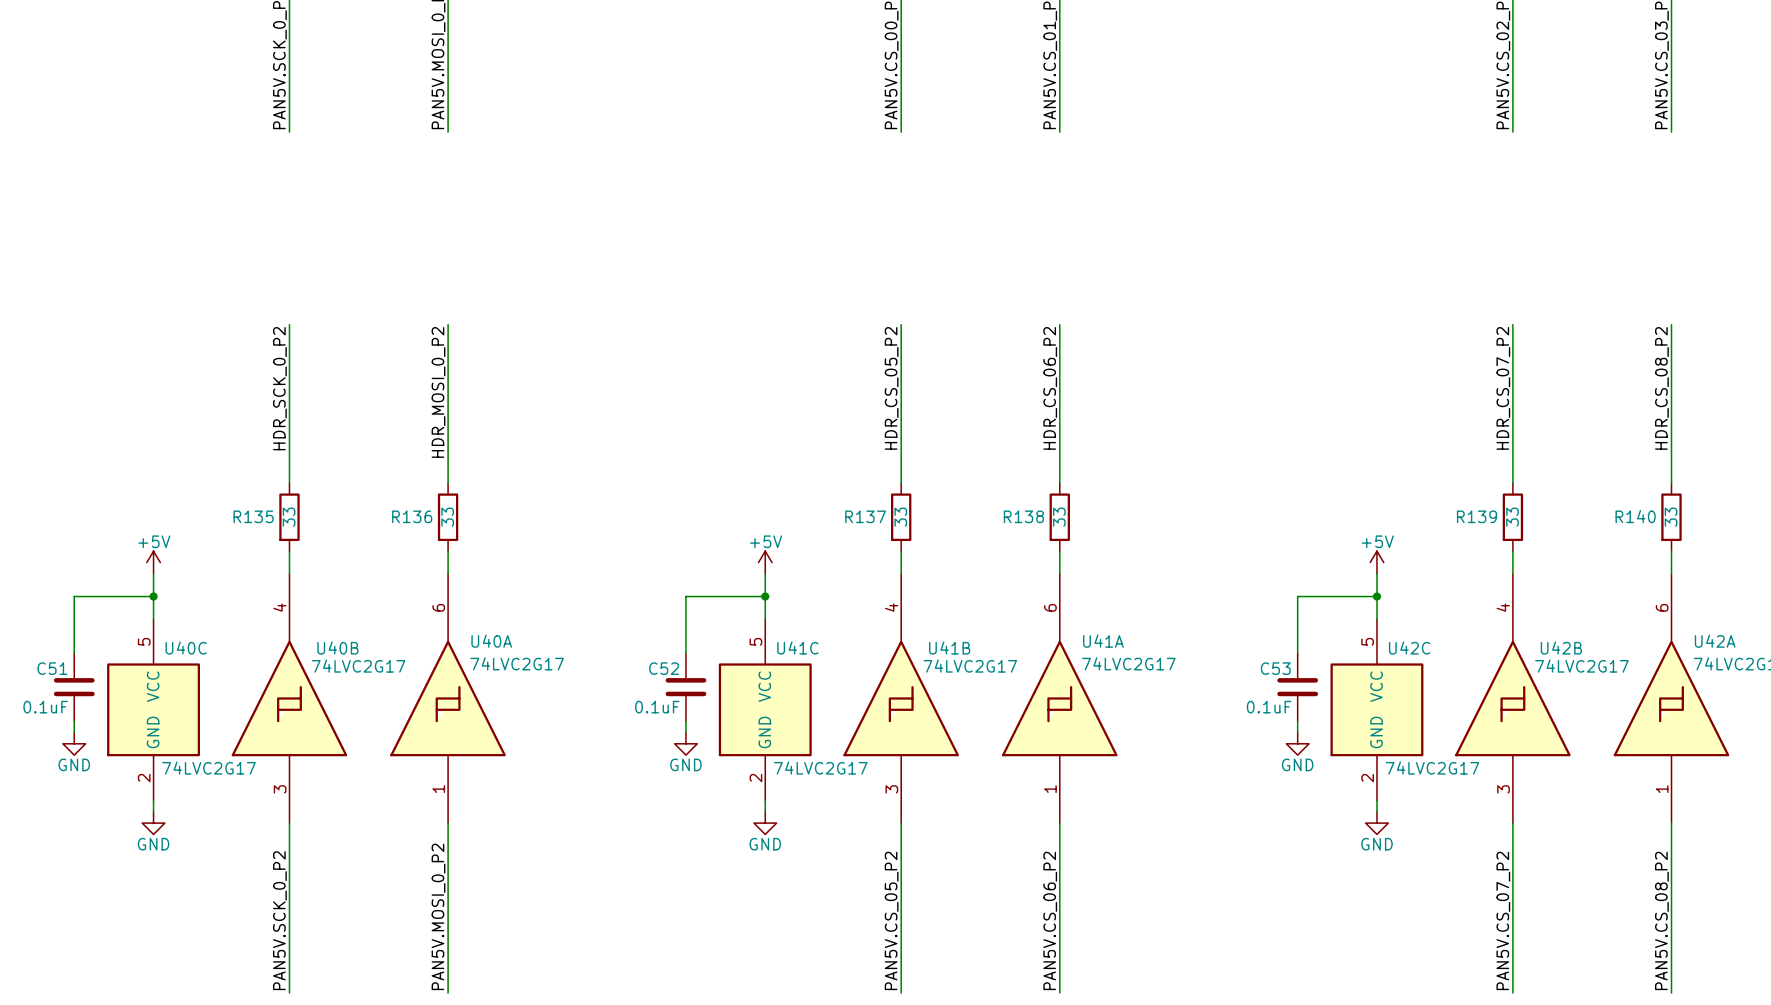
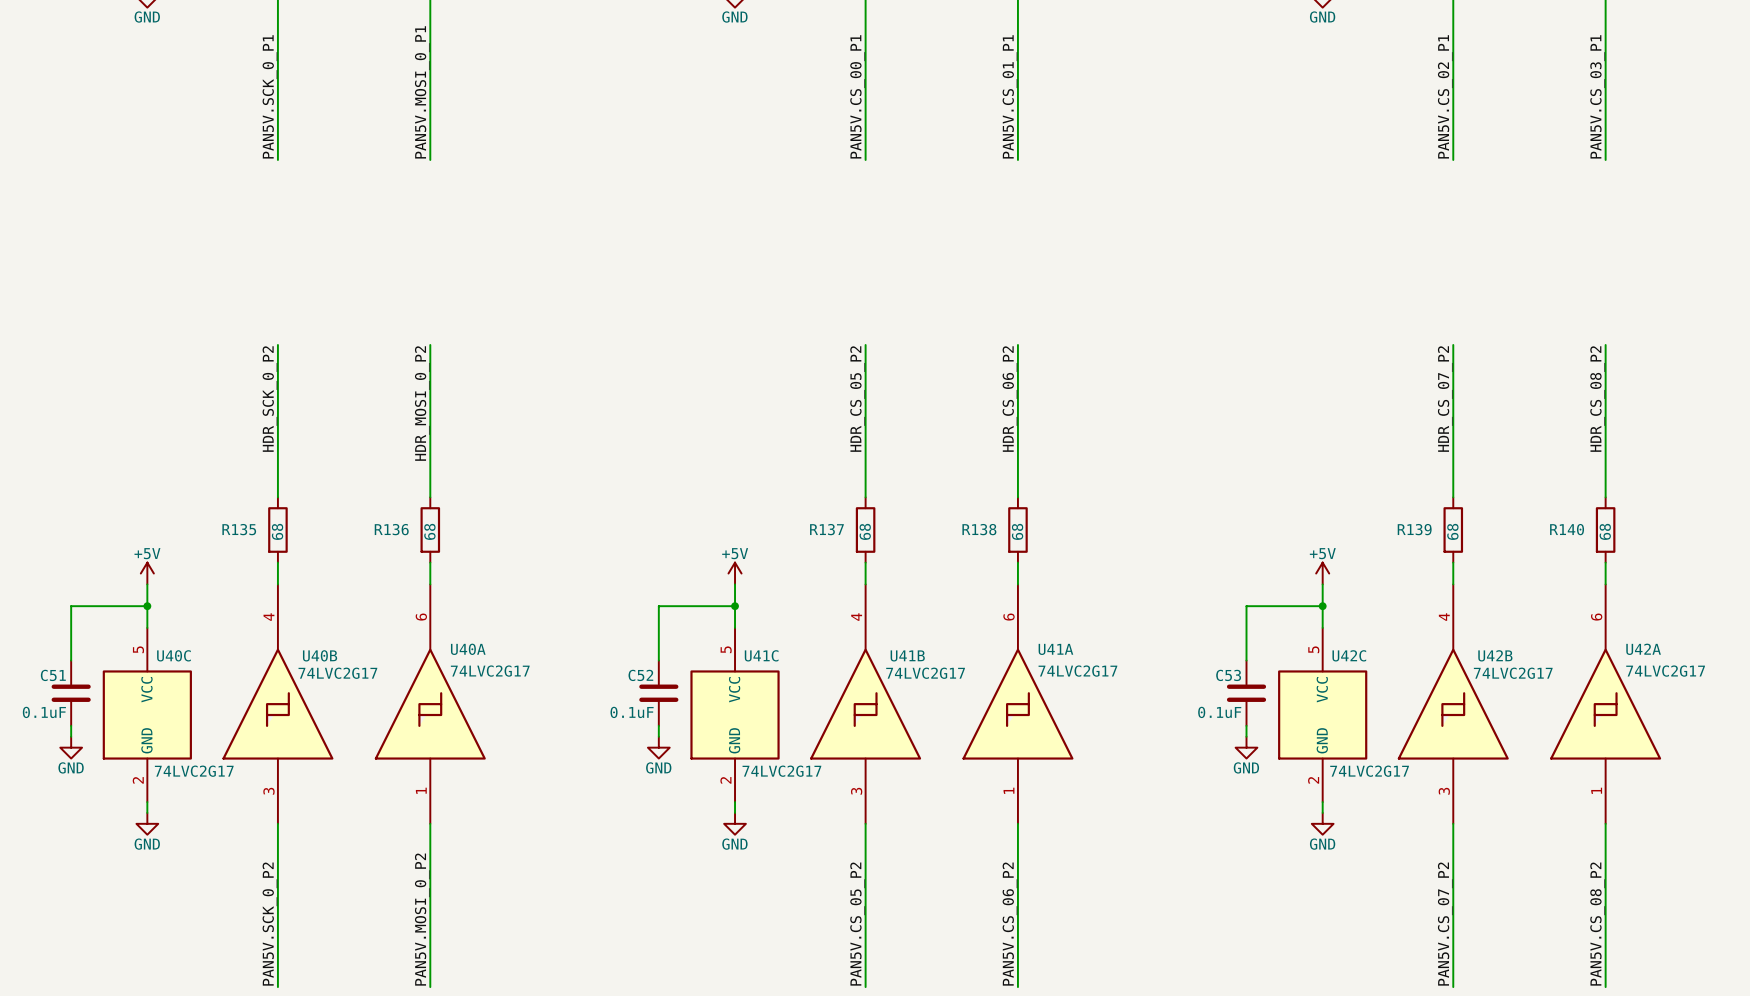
R135 value: 33 (289, 517) -> 68 (277, 531)
R136 value: 33 (447, 517) -> 68 (429, 531)
R137 value: 33 (900, 517) -> 68 (865, 531)
R138 value: 33 (1059, 517) -> 68 (1017, 531)
R139 value: 33 (1512, 517) -> 68 (1452, 531)
R140 value: 33 (1671, 517) -> 68 (1605, 531)

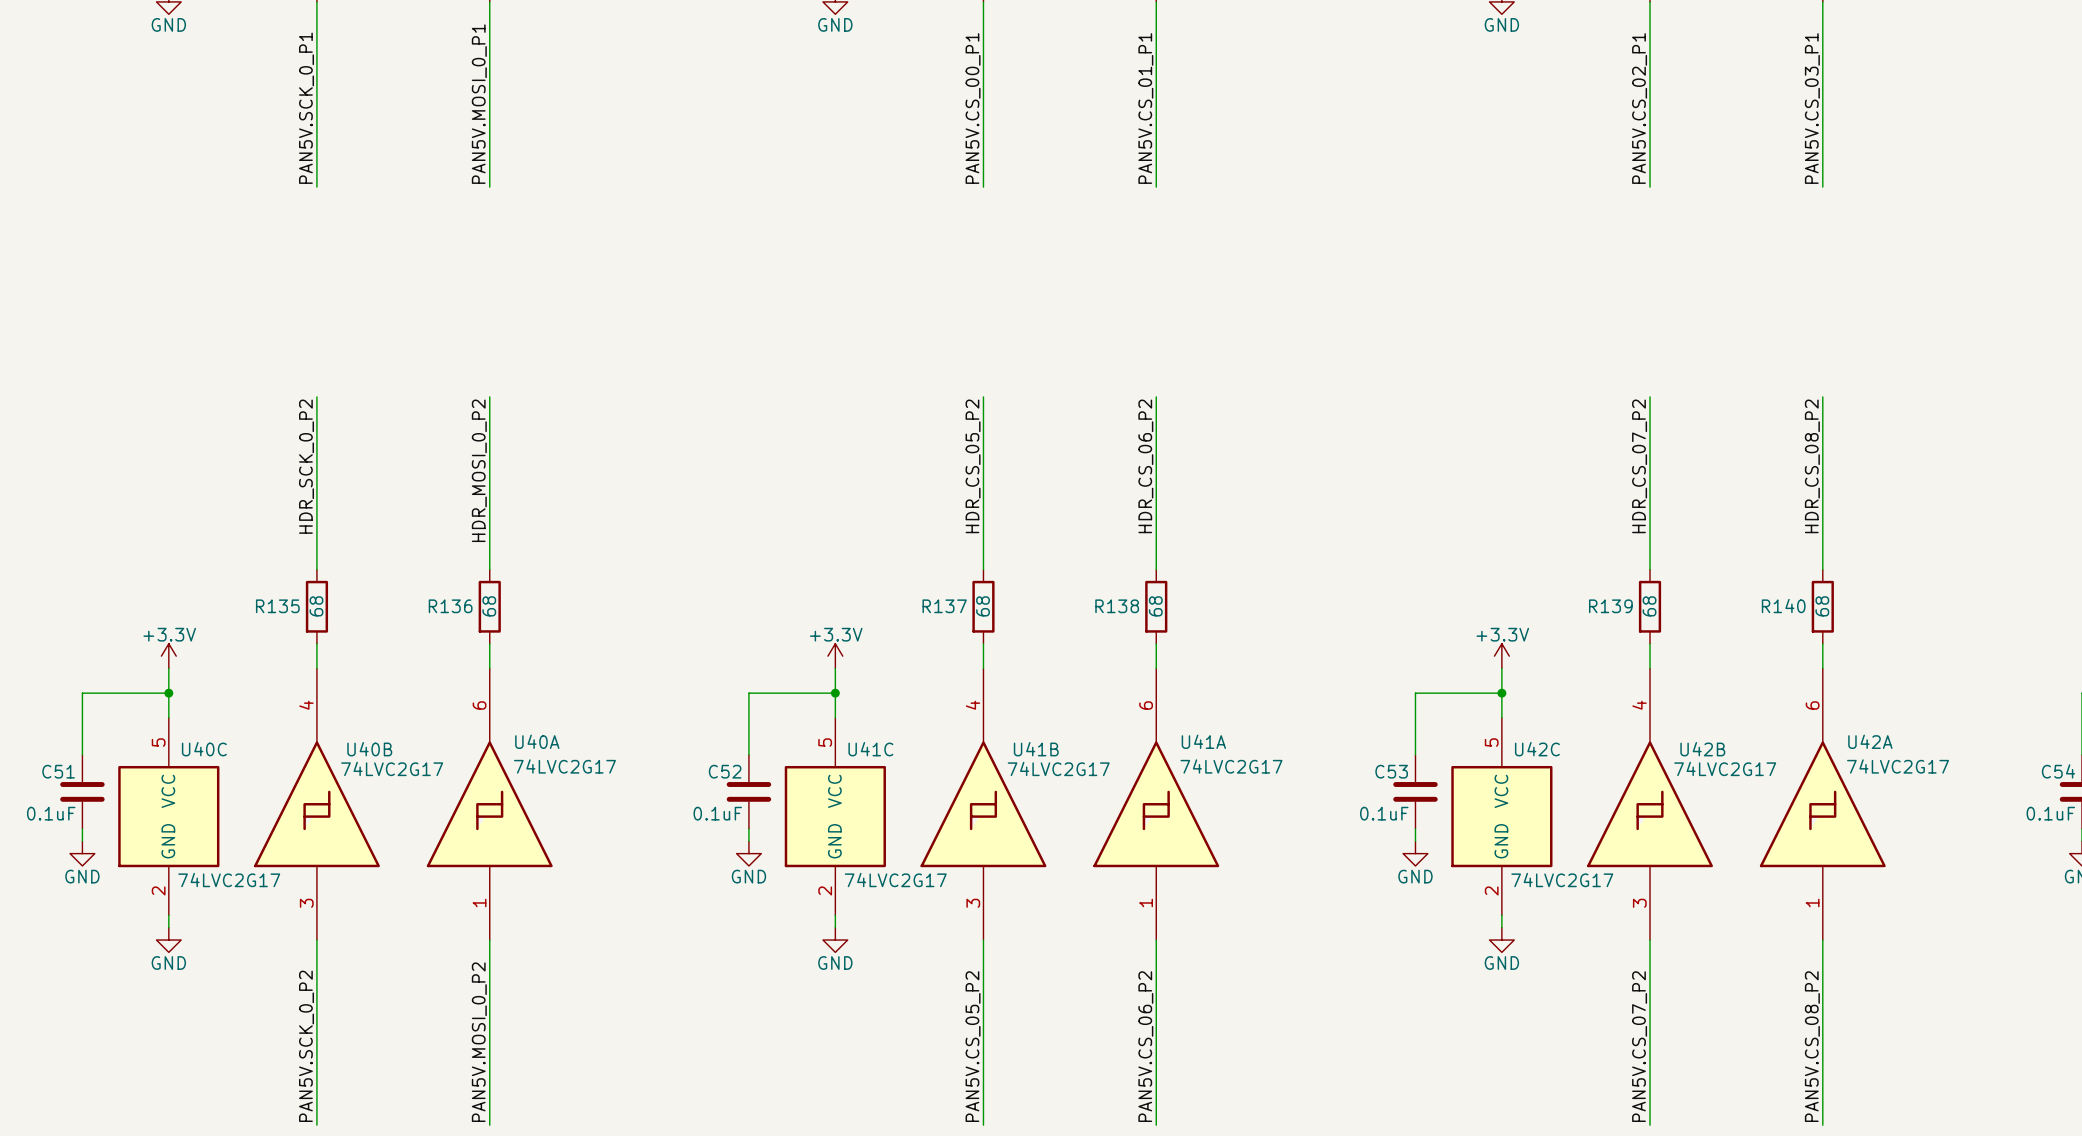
power symbol: +5V (147, 573) -> +3.3V (168, 656)
power symbol: +5V (735, 573) -> +3.3V (835, 656)
power symbol: +5V (1322, 573) -> +3.3V (1501, 656)

